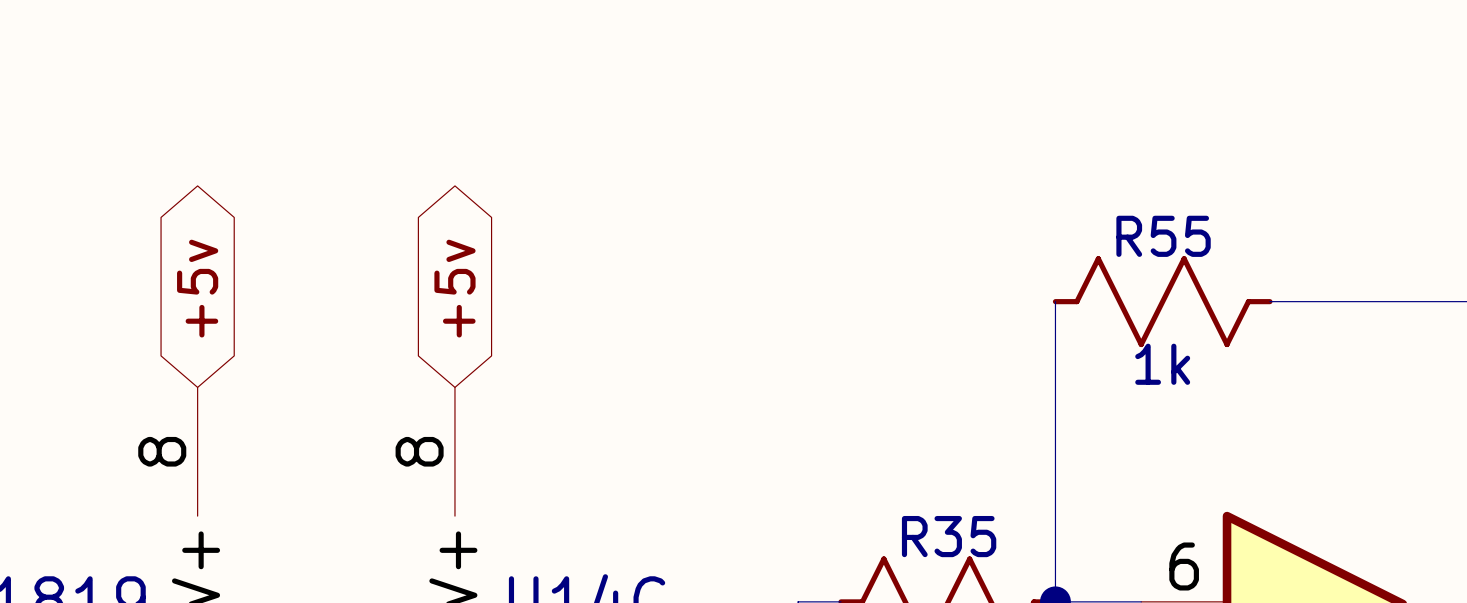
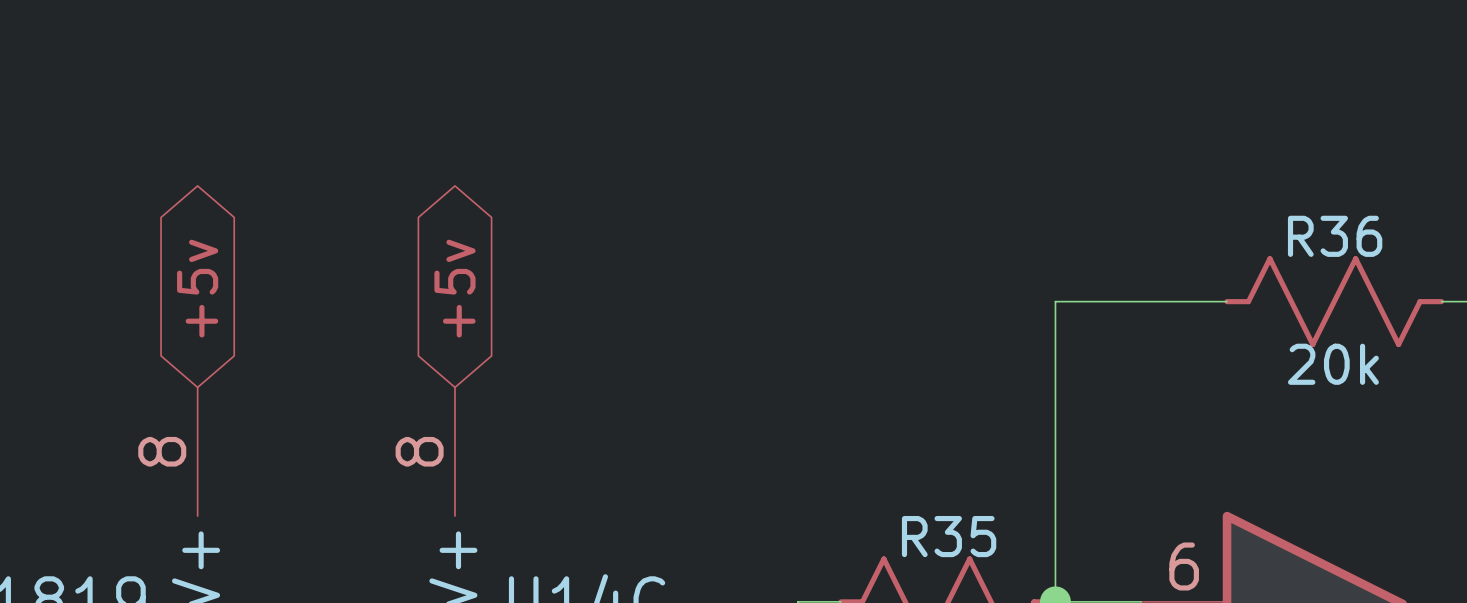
R55: 1k (1162, 301) -> none
wire: (1269, 301) (1441, 301) -> (1055, 301) (1227, 301)
R36: none -> 20k (1334, 301)

